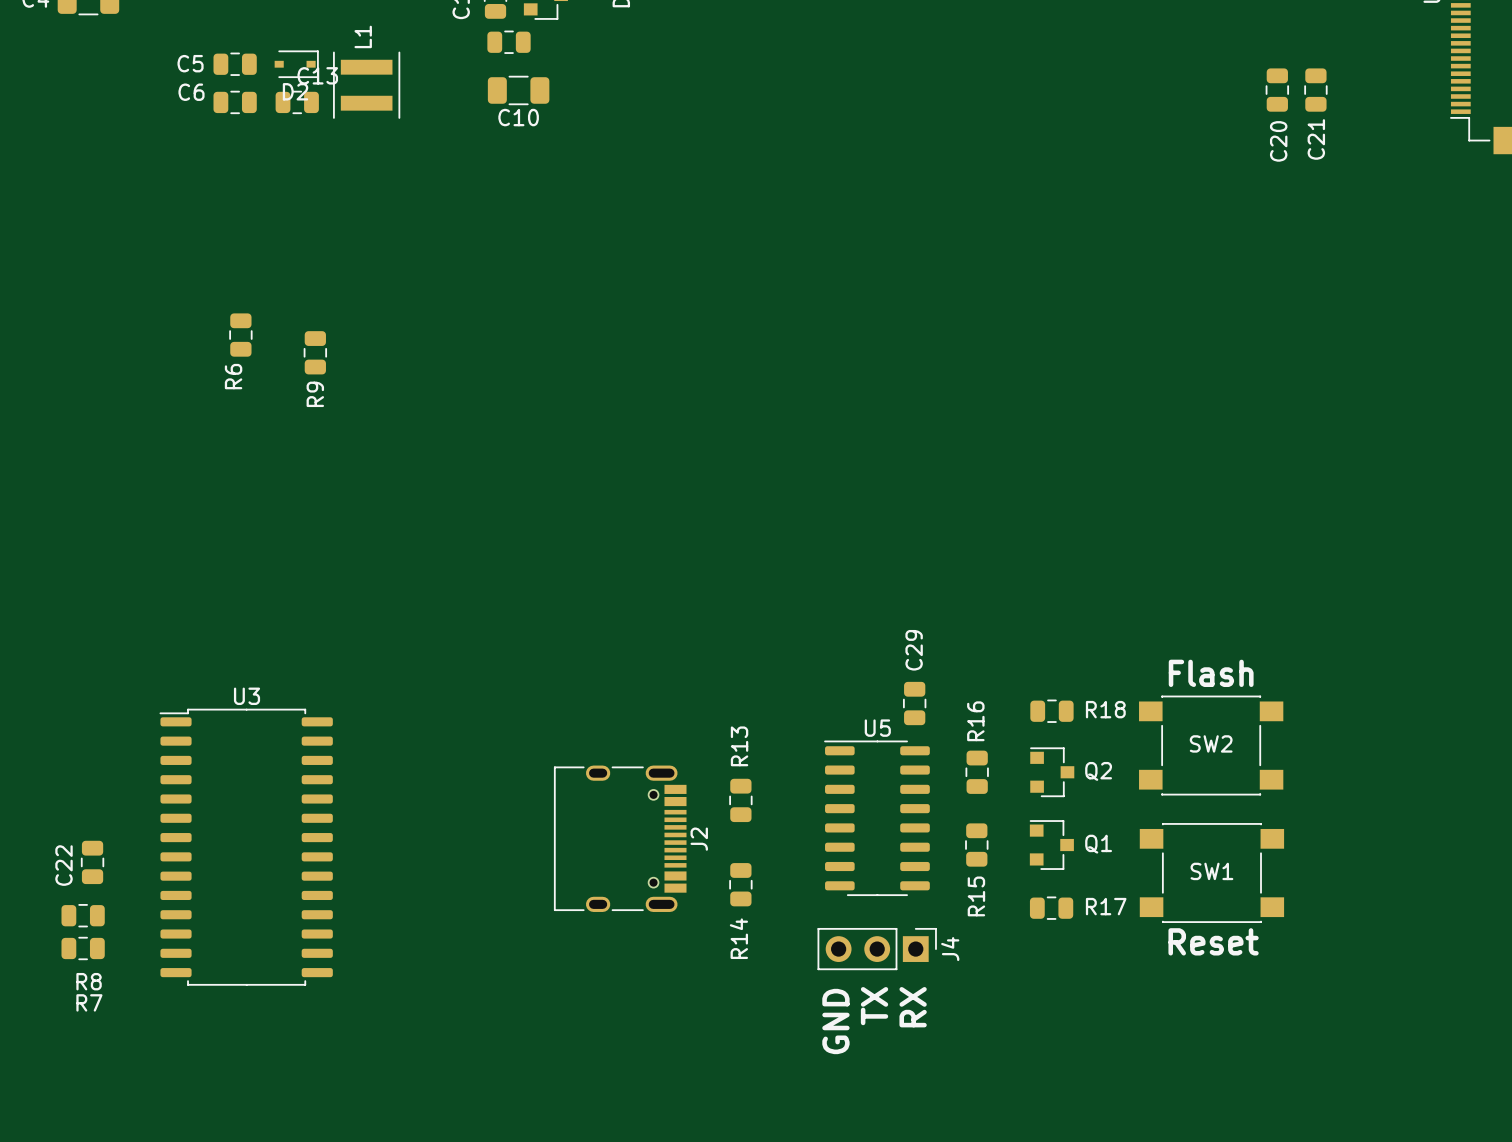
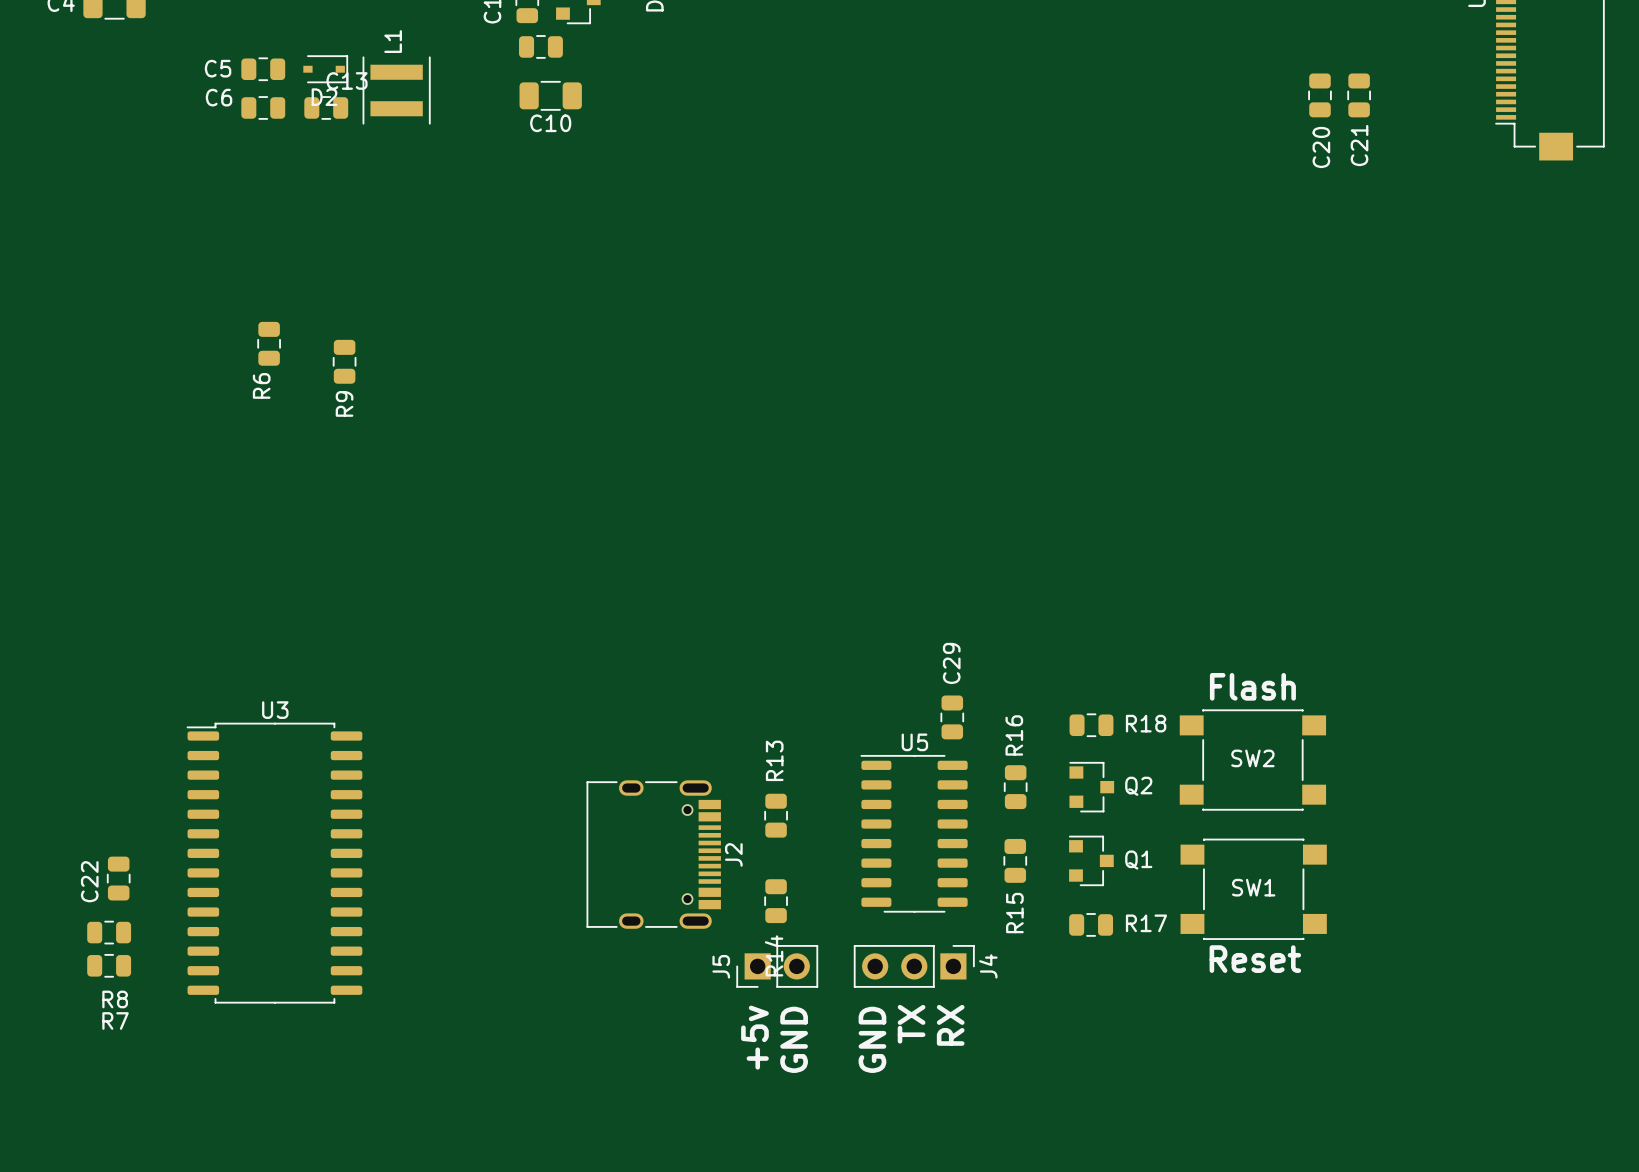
J5: none -> (777, 966)
text: none -> +5v (754, 1037)
text: none -> GND (794, 1039)

